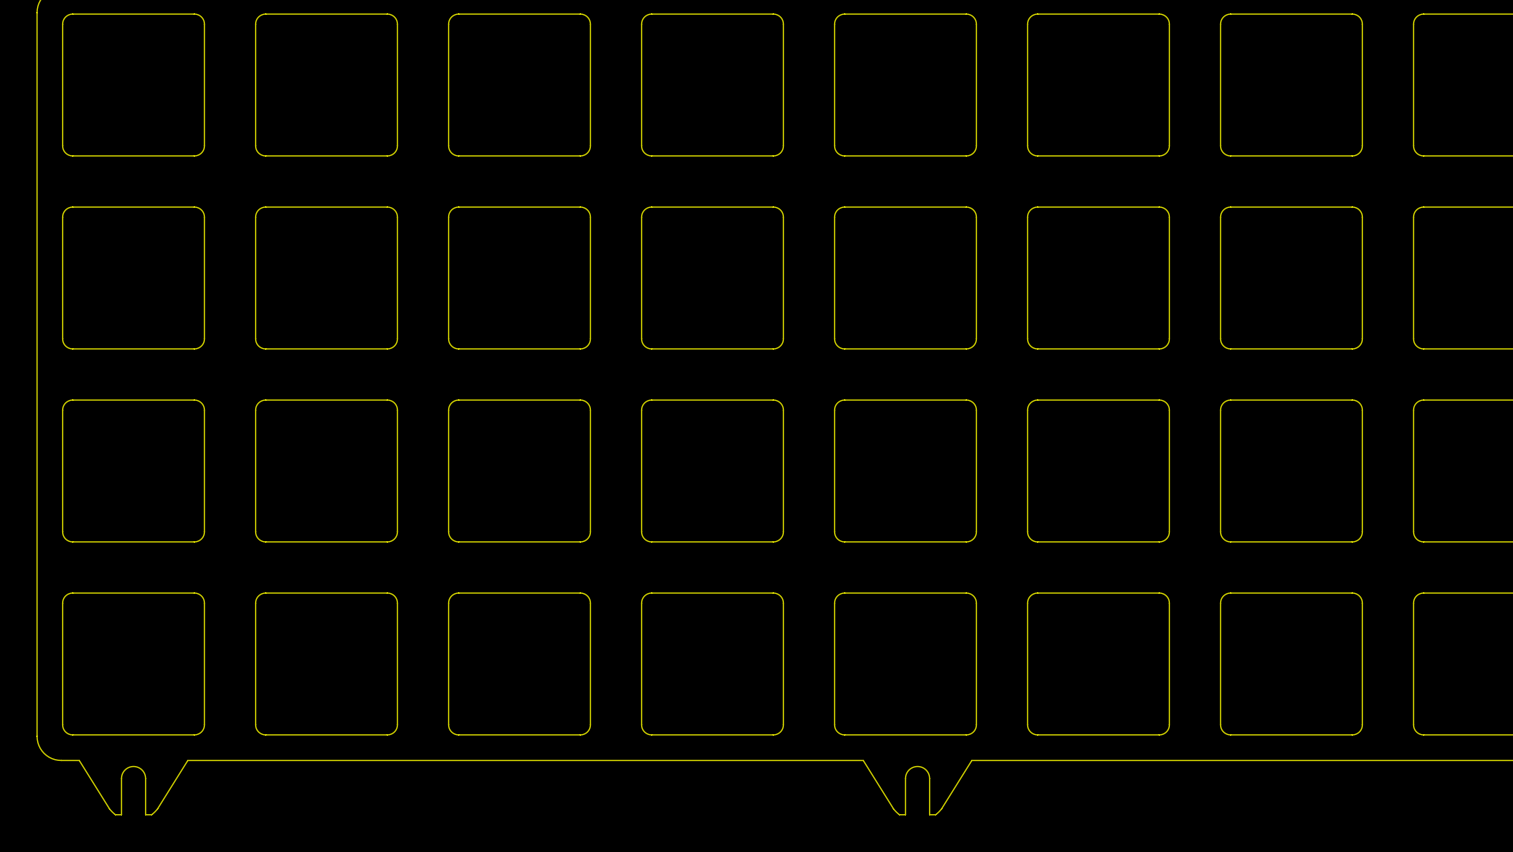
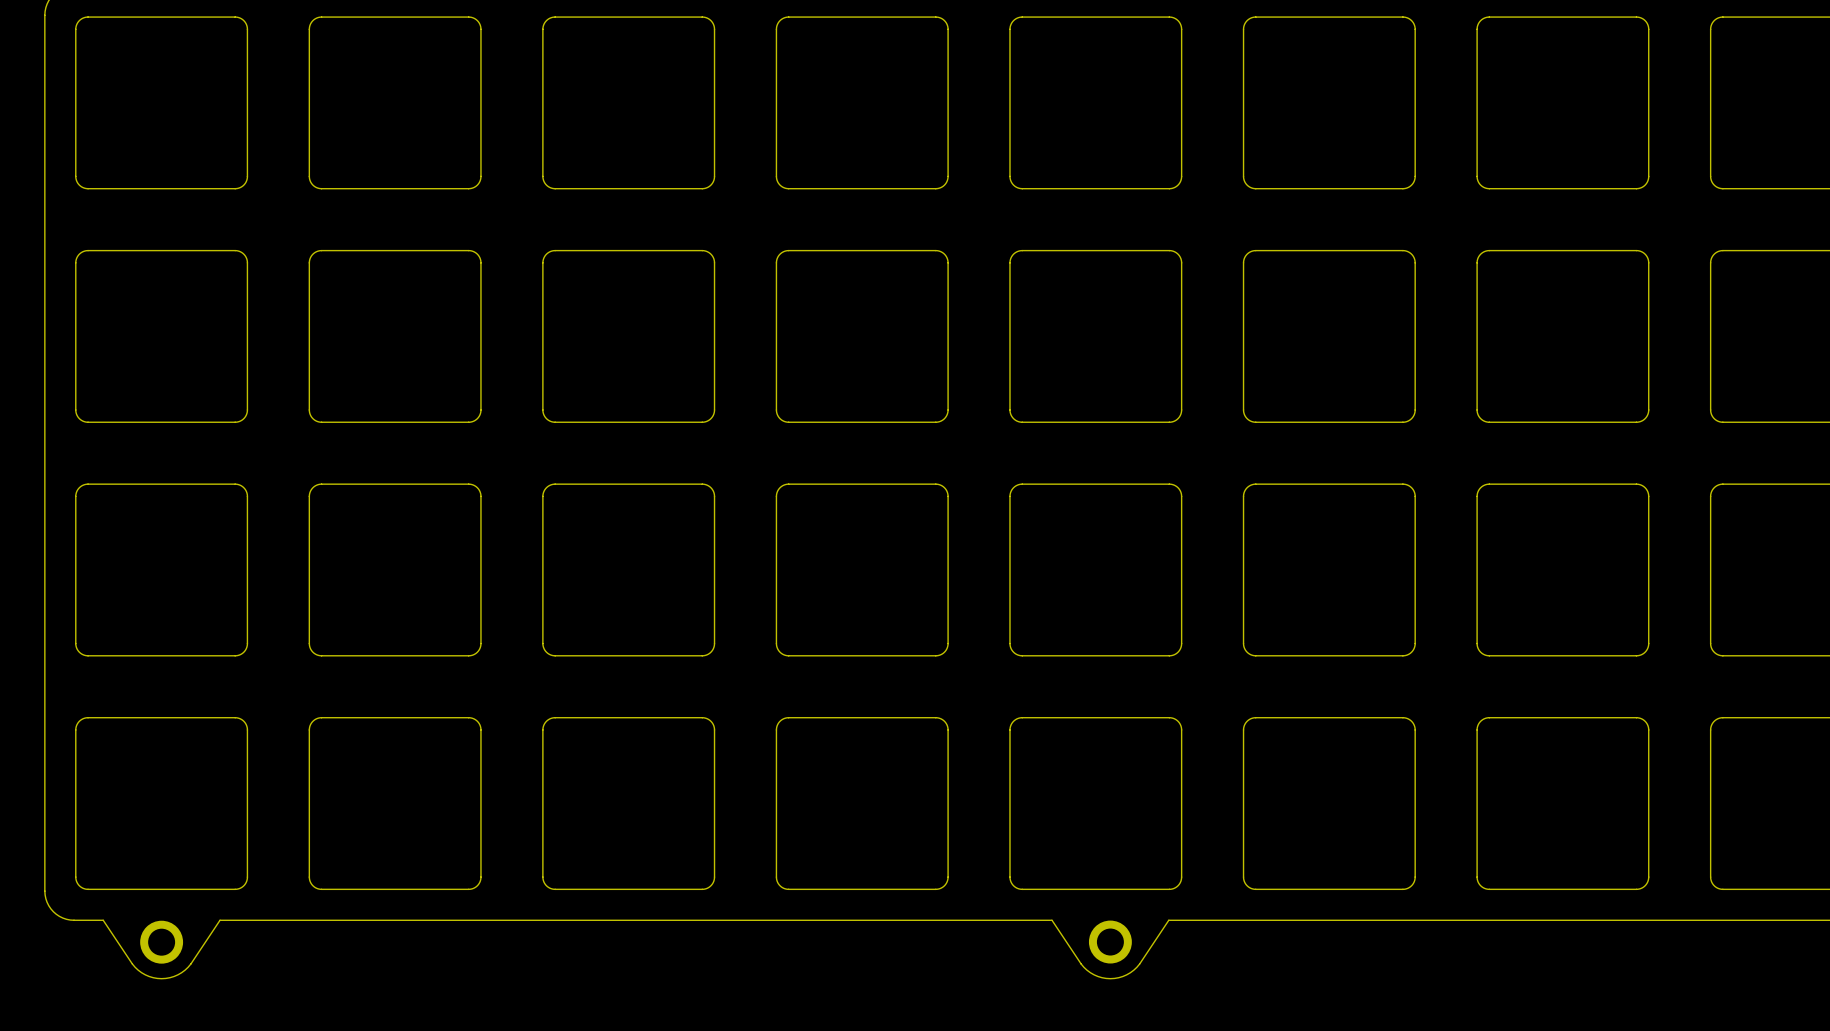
board edge: (61, 760) (79, 760) (109, 808) (115, 814) (121, 814) (121, 776) (126, 768) (135, 766) (143, 772) (145, 814) (151, 814) (157, 808) (187, 760) -> (74, 920) (103, 920) (135, 967) (149, 976) (161, 978) (174, 976) (185, 970) (220, 920) (227, 920)
board edge: (863, 760) (893, 808) (899, 814) (905, 814) (907, 772) (914, 766) (924, 768) (929, 776) (929, 814) (935, 814) (941, 808) (971, 760) -> (1044, 920) (1052, 920) (1087, 970) (1097, 976) (1110, 978) (1122, 976) (1133, 970) (1168, 920) (1176, 920)
part: none -> (161, 942)
part: none -> (1110, 942)

